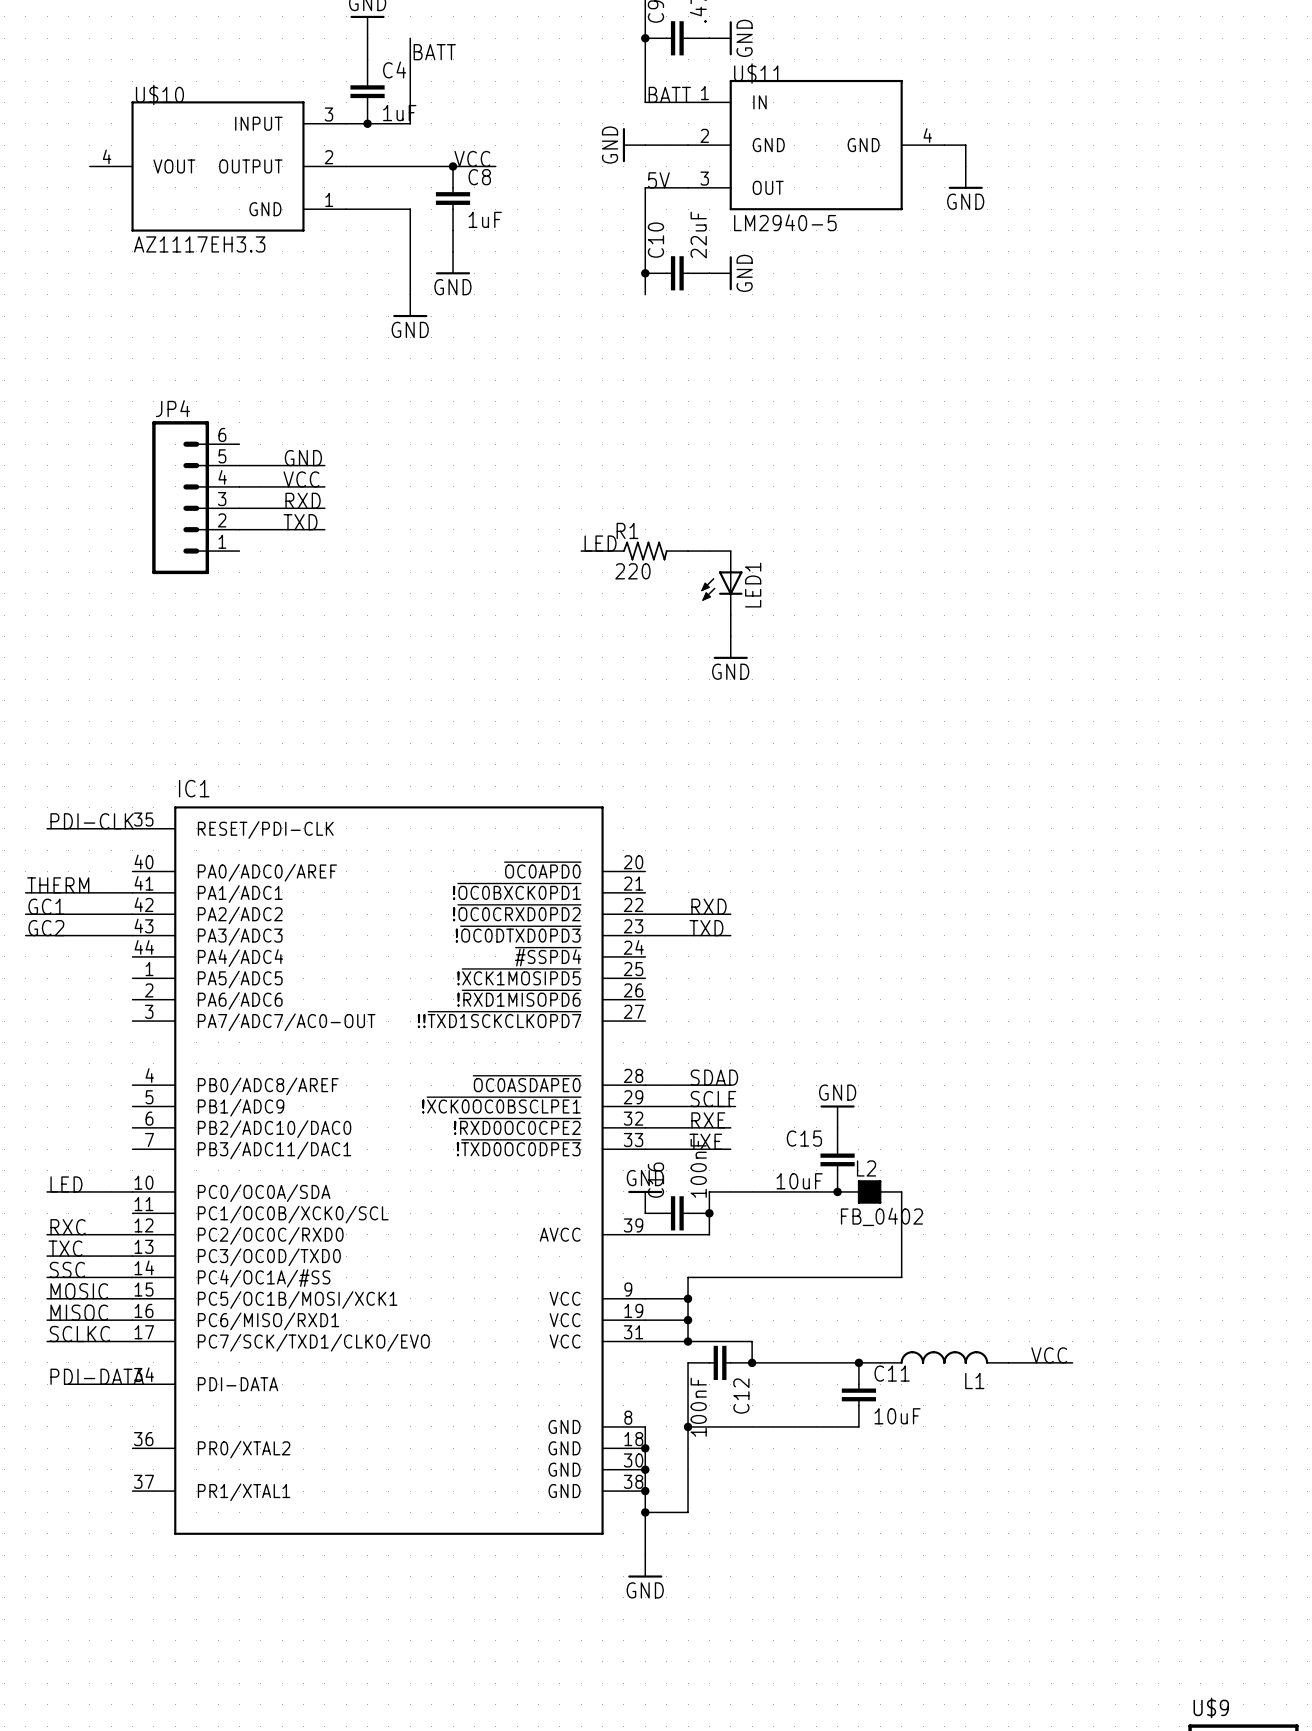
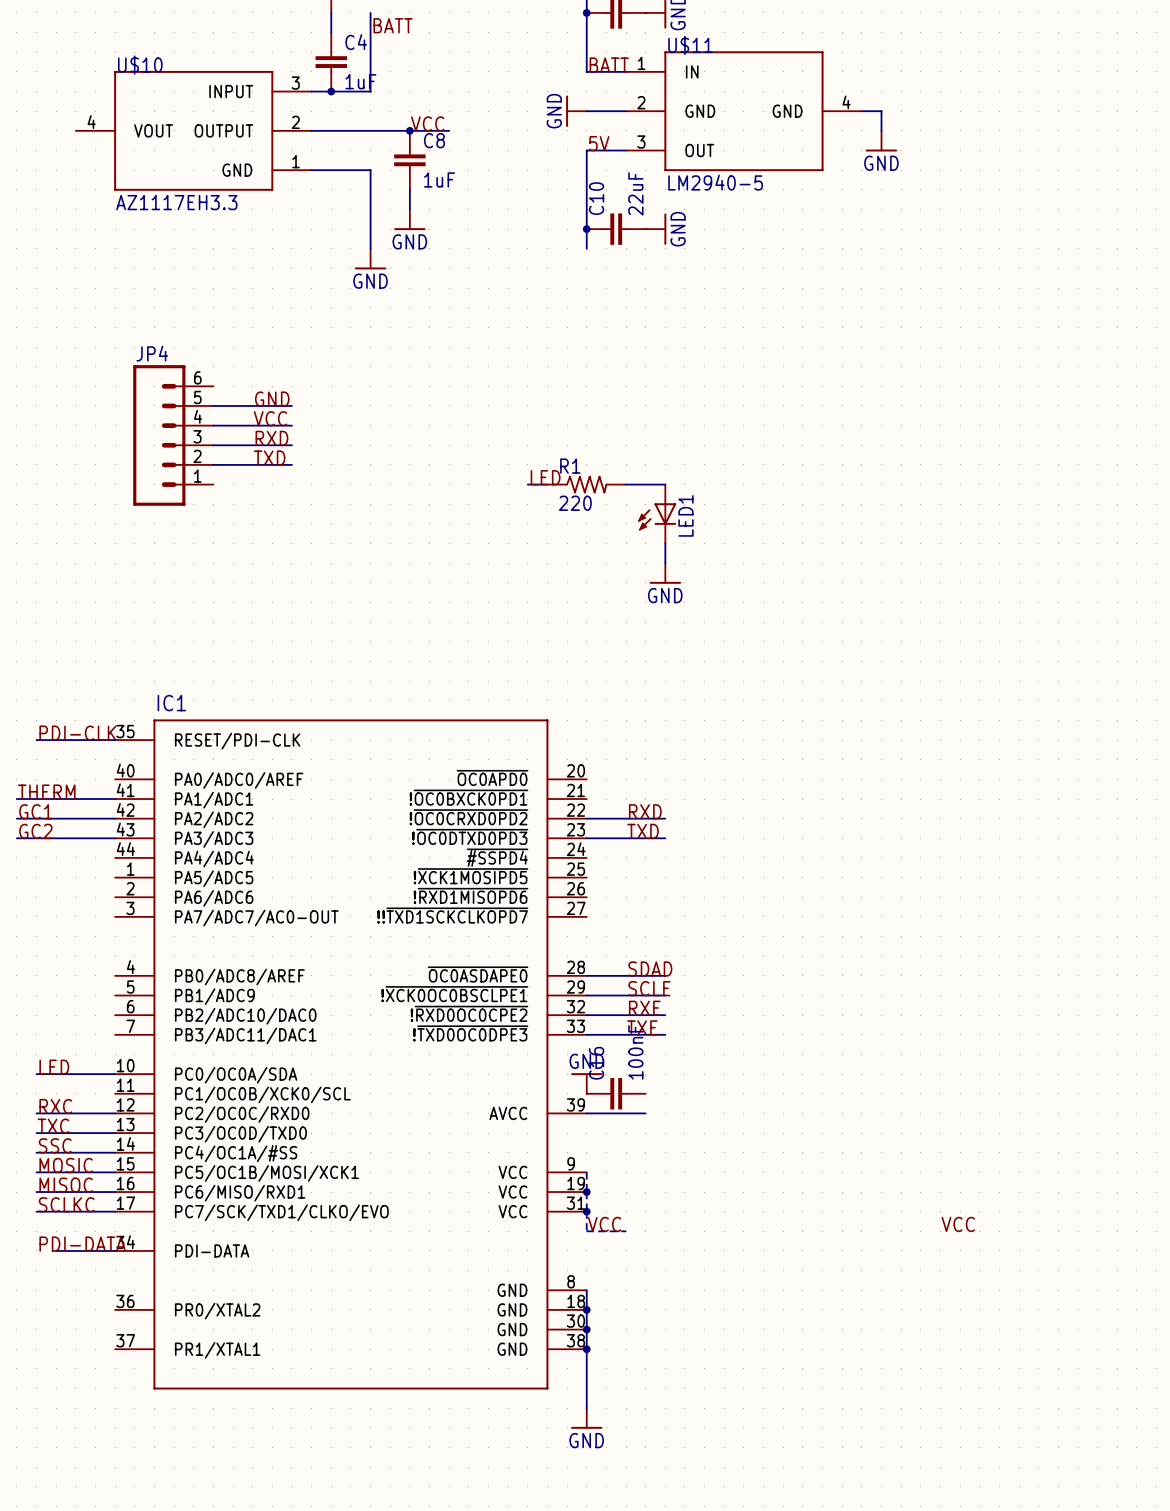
power symbol: GND (837, 1116) -> none
C15: 10uF (837, 1159) -> none
wire: (837, 1191) (709, 1191) (709, 1234) -> none
junction: (837, 1191) -> none
L2: FB_0402 (869, 1191) -> none
wire: (901, 1191) (901, 1277) (688, 1277) (688, 1341) -> none
junction: (709, 1213) -> none
wire: (645, 1298) (688, 1298) -> (586, 1172) (586, 1231) (626, 1231)
junction: (688, 1298) -> none
wire: (645, 1320) (688, 1320) -> none
junction: none -> (586, 1192)
junction: (688, 1320) -> none
wire: (645, 1341) (752, 1341) (752, 1362) (880, 1362) -> none
junction: none -> (586, 1211)
junction: (688, 1341) -> none
label: none -> VCC (604, 1224)
L1: (944, 1357) -> none
wire: (688, 1362) (688, 1512) (645, 1512) -> none
C12: 100nF (720, 1362) -> none
junction: (752, 1362) -> none
junction: (858, 1362) -> none
wire: (1008, 1362) (1072, 1362) -> none
C11: 10uF (858, 1394) -> none
wire: (688, 1426) (858, 1426) -> none
junction: (688, 1426) -> none
junction: (645, 1512) -> none

